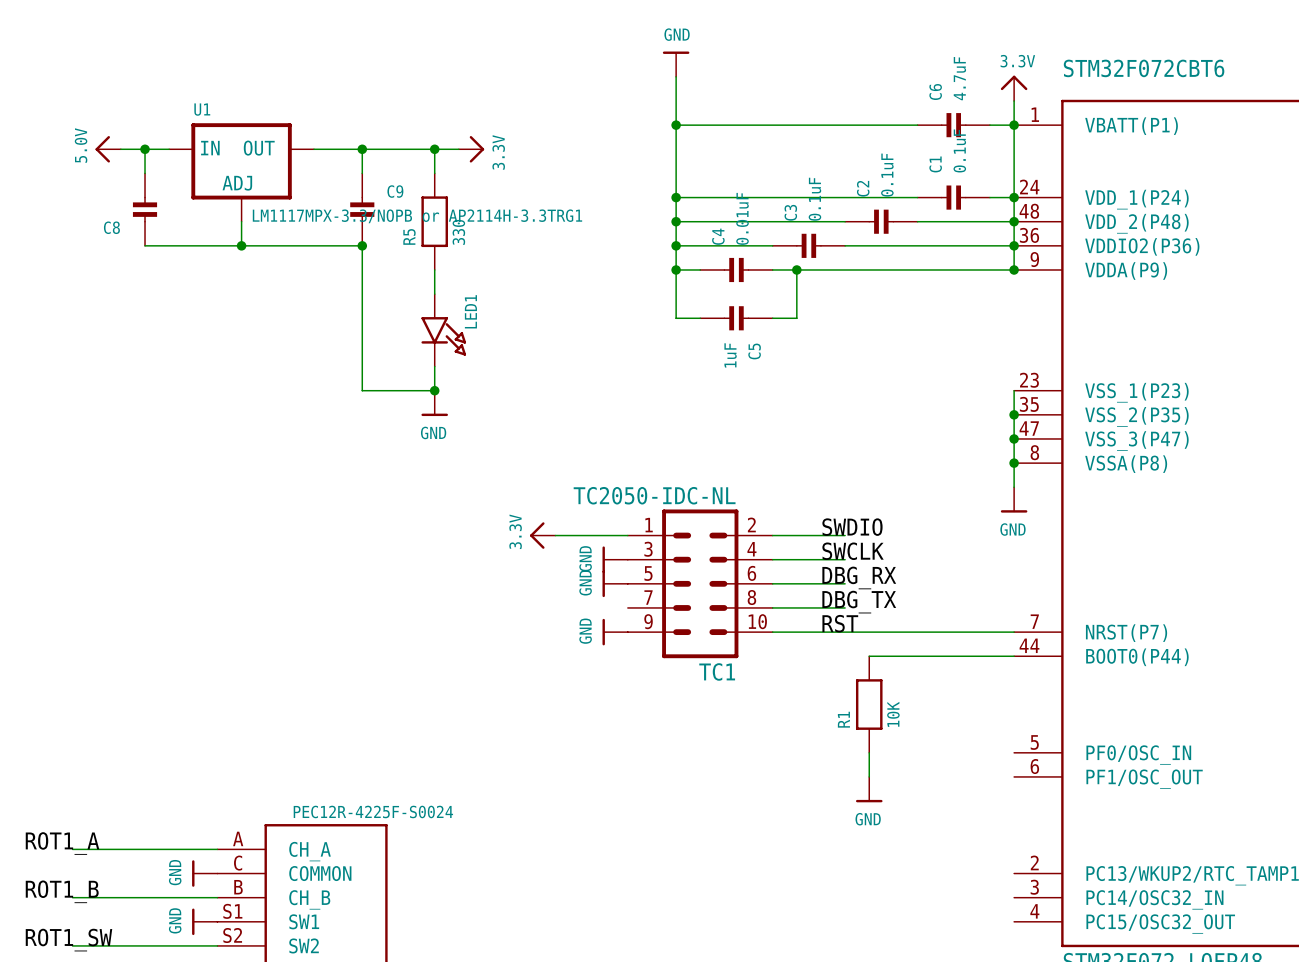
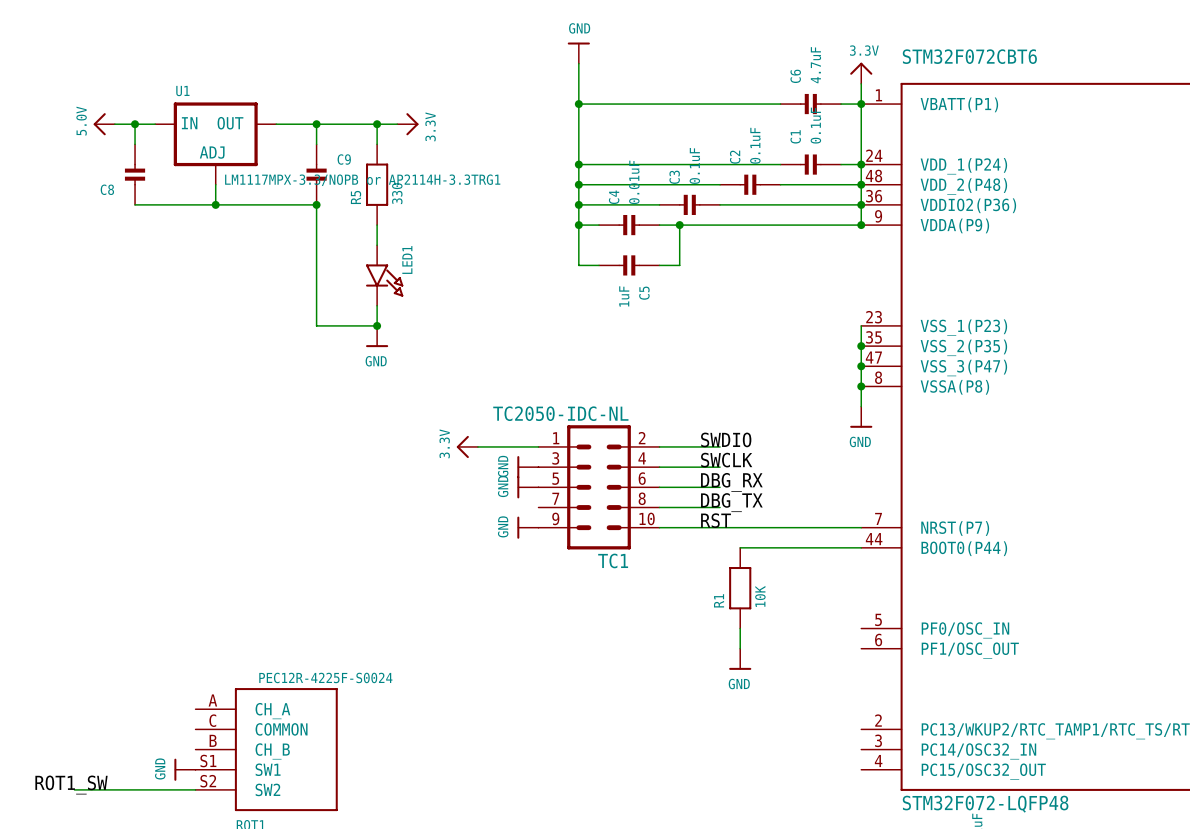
label: ROT1_A (62, 843) -> none
wire: (72, 849) (217, 849) -> none
power symbol: GND (204, 873) -> none
label: ROT1_B (62, 891) -> none
wire: (72, 897) (217, 897) -> none

